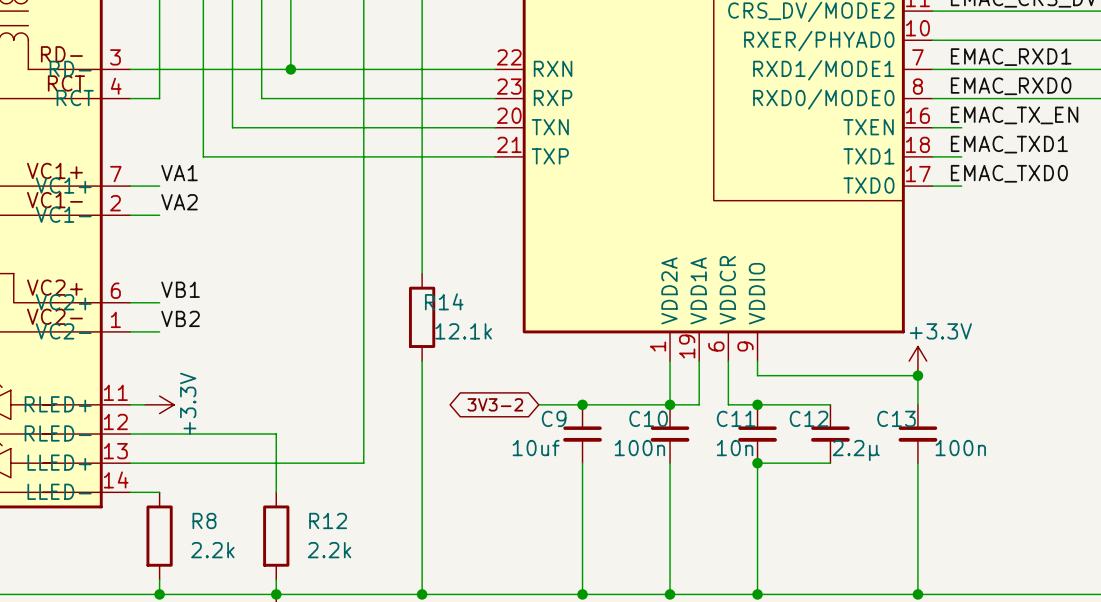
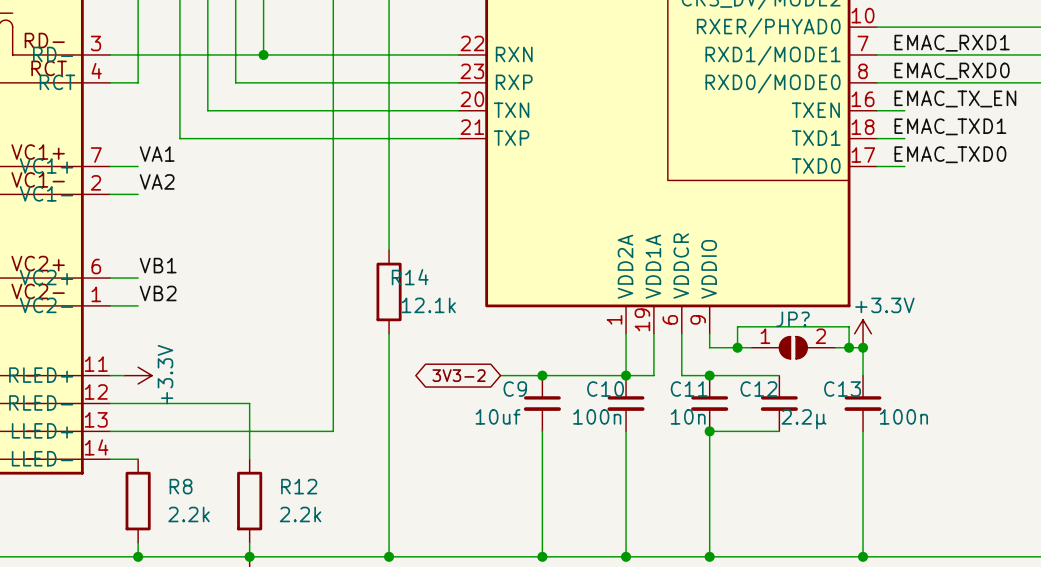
wire: none -> (737, 347) (737, 326) (849, 326) (849, 347)
junction: none -> (737, 347)
JP?: none -> (793, 347)
junction: none -> (849, 347)

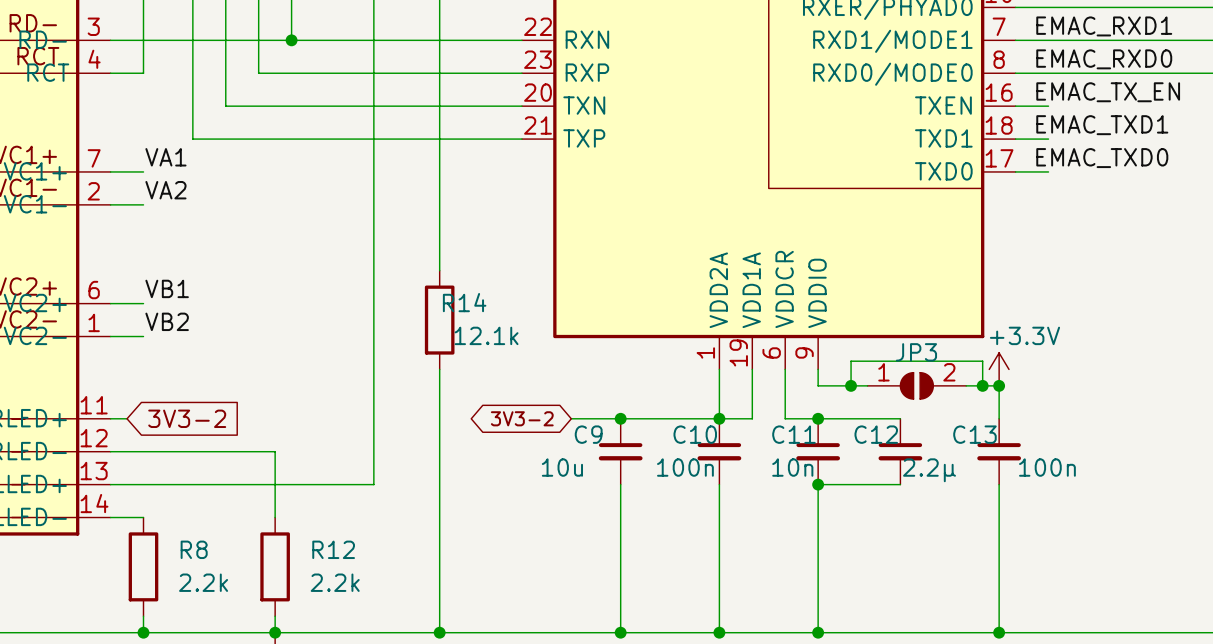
JP? name: JP? (792, 319) -> JP3 (916, 352)
power symbol: +3.3V (138, 375) -> none
global label: none -> 3V3-2 (187, 418)
C9 value: 10uf (498, 416) -> 10u (562, 467)

